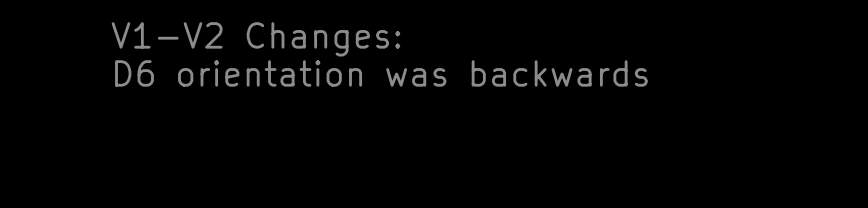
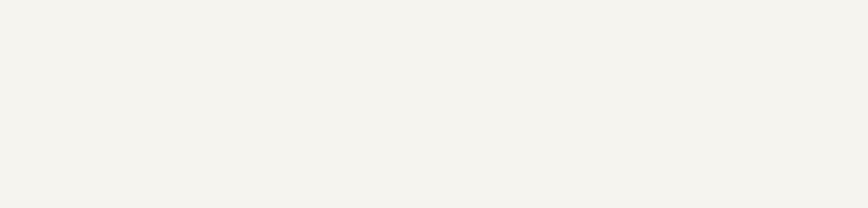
text: V1-V2 Changes: (255, 39) -> none
text: D6 orientation was backwards (381, 73) -> none

